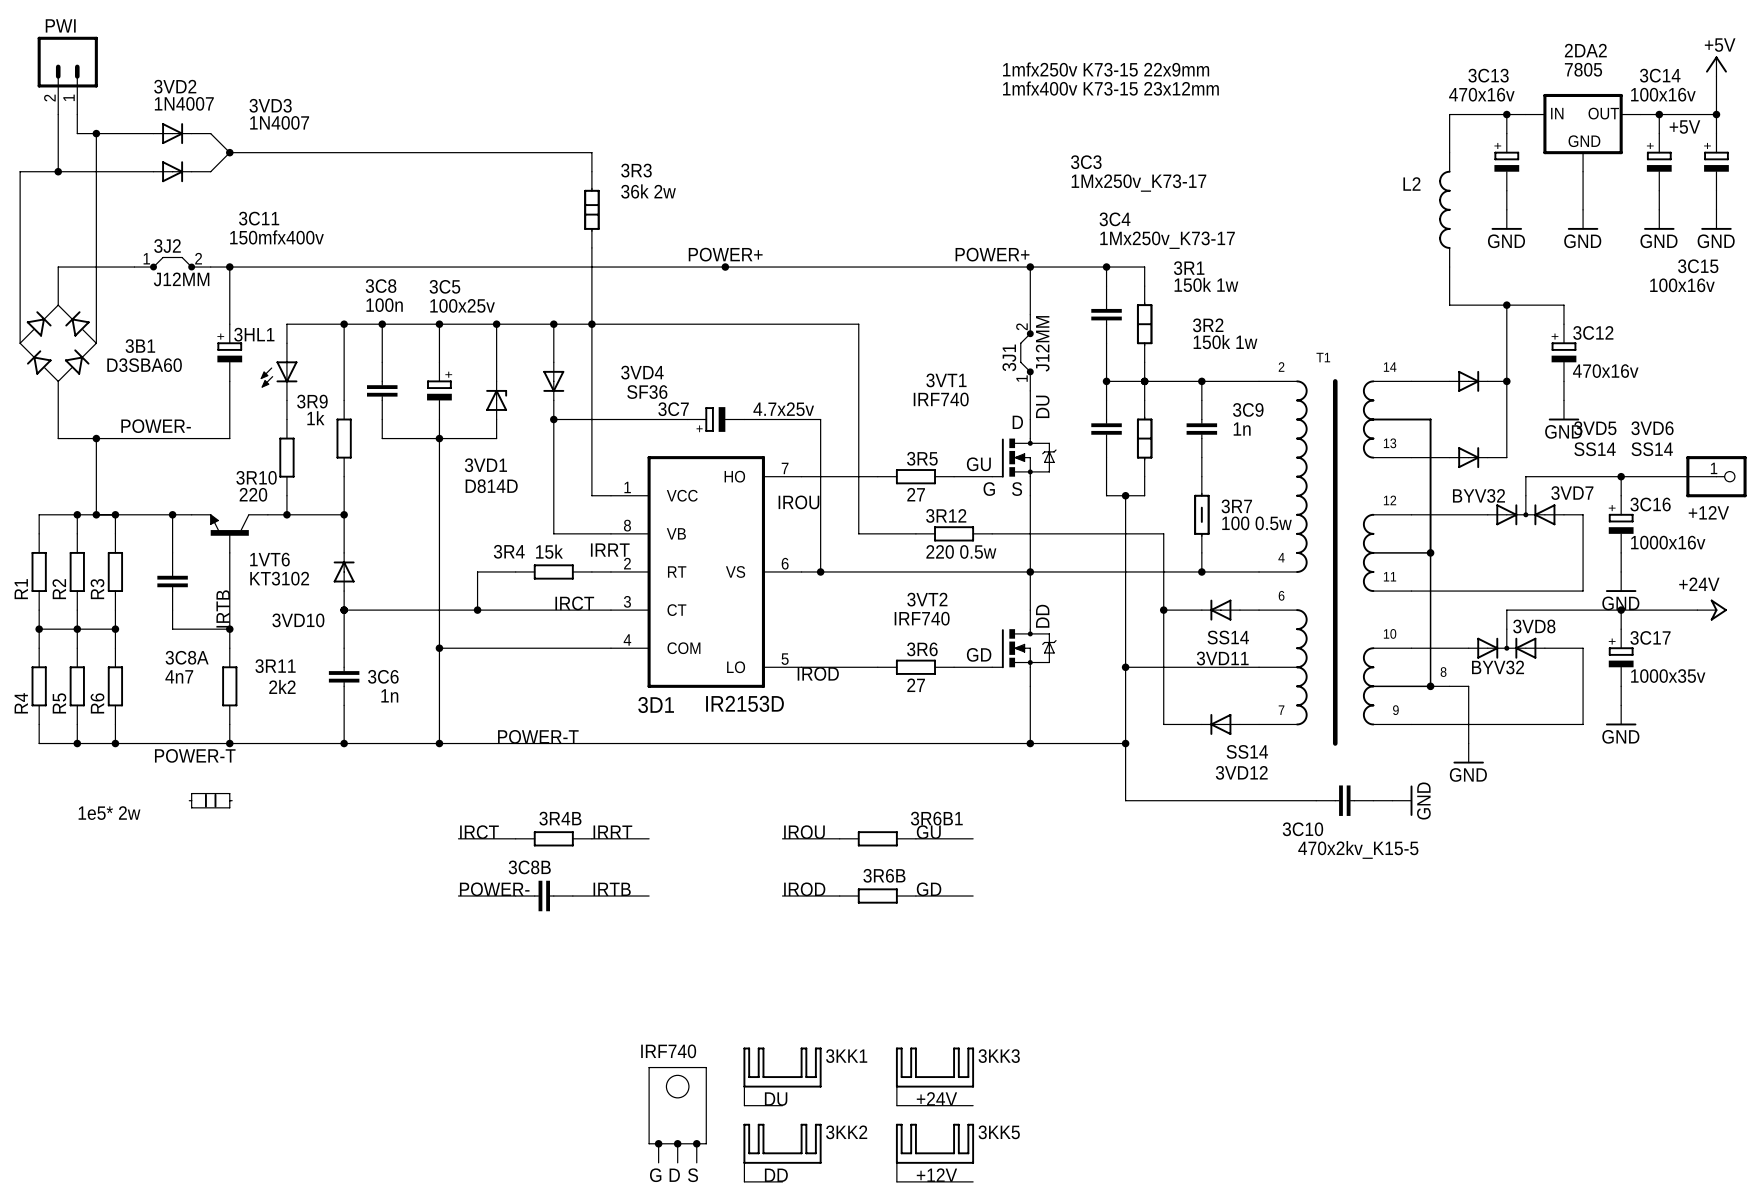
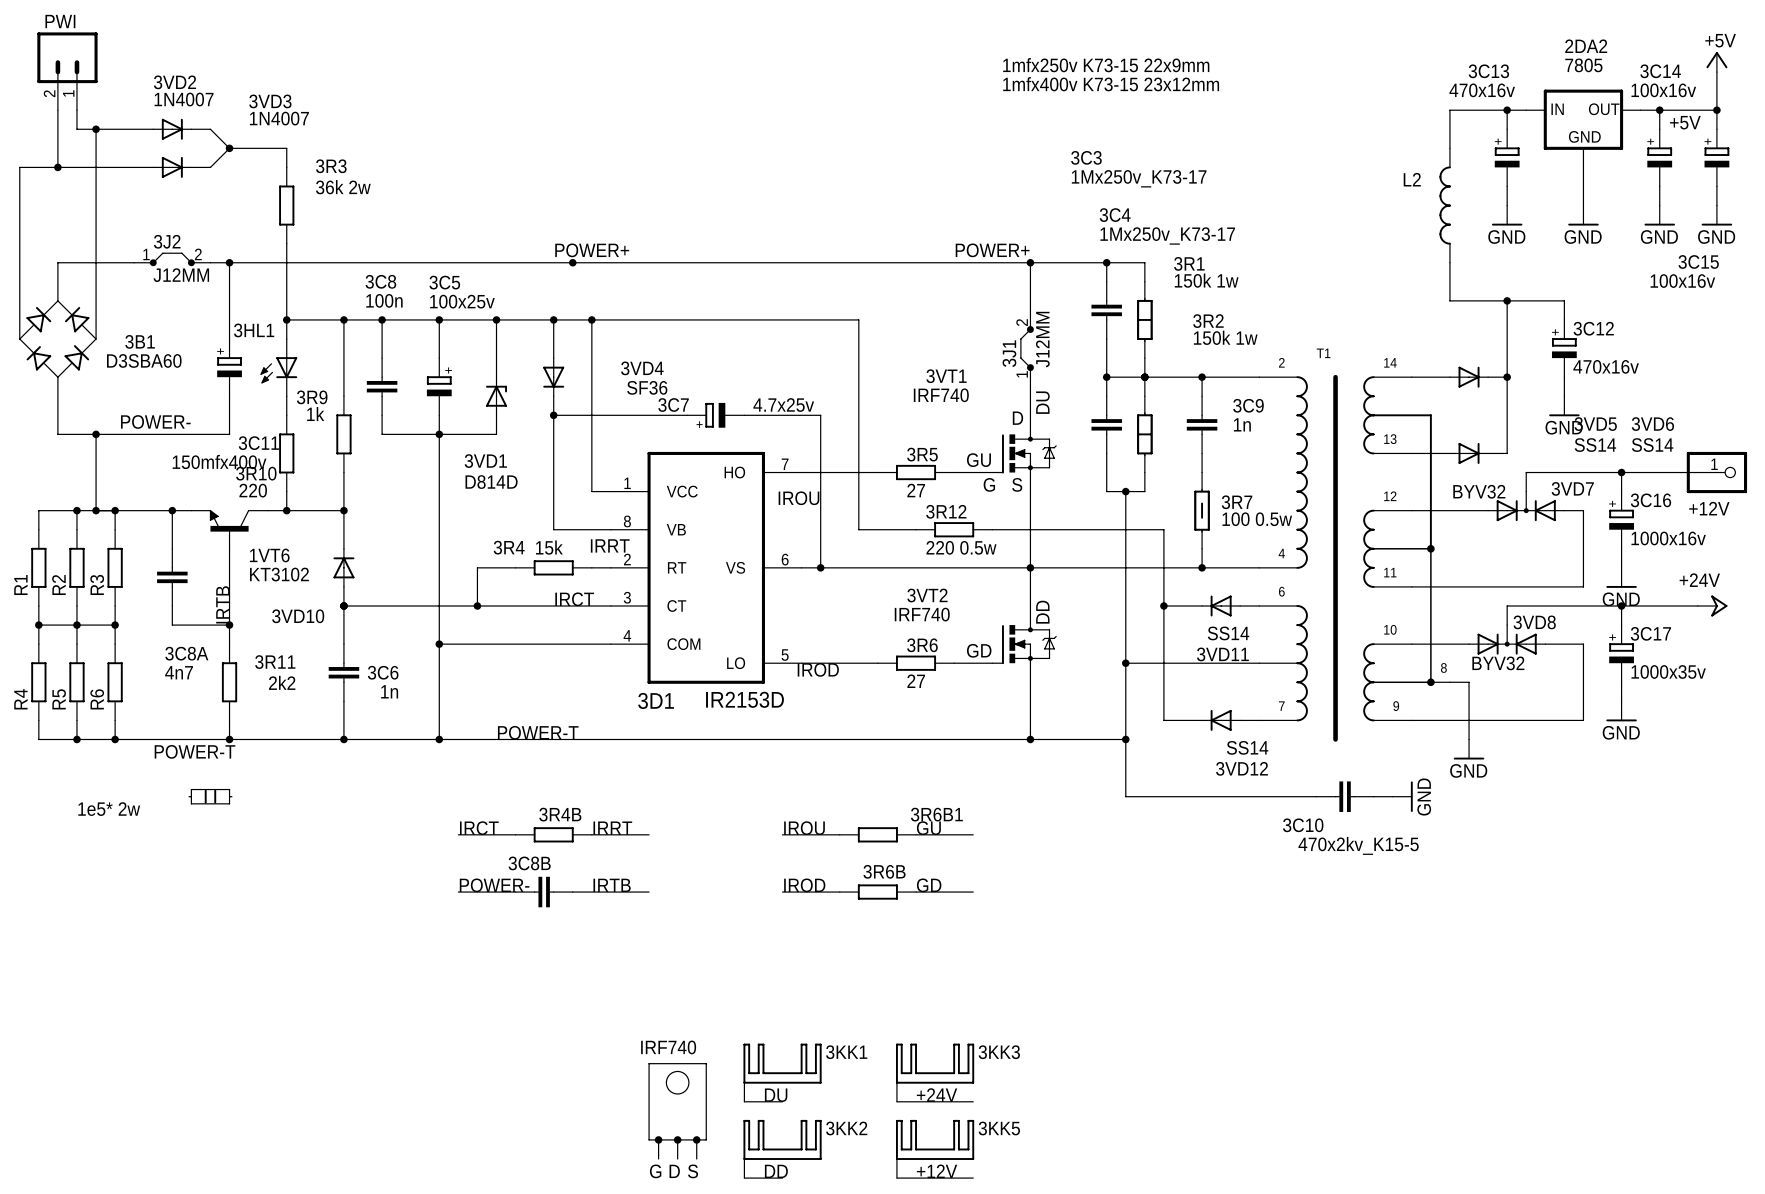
wire: (286, 152) (591, 152) (591, 171) -> (286, 148) (286, 167)
3R3 position: (591, 209) -> (286, 205)
part: (591, 209) -> none
3C11 name position: 3C11 (259, 218) -> 3C11 (258, 443)
3C11 value position: 150mfx400v (277, 237) -> 150mfx400v (219, 461)
wire: none -> (286, 243) (286, 319)
wire: (591, 247) (591, 324) -> none
label position: POWER+ (725, 254) -> POWER+ (592, 250)
junction: none -> (572, 262)
junction: (725, 267) -> none
junction: none -> (286, 319)
3C11 position: (229, 352) -> (229, 367)

